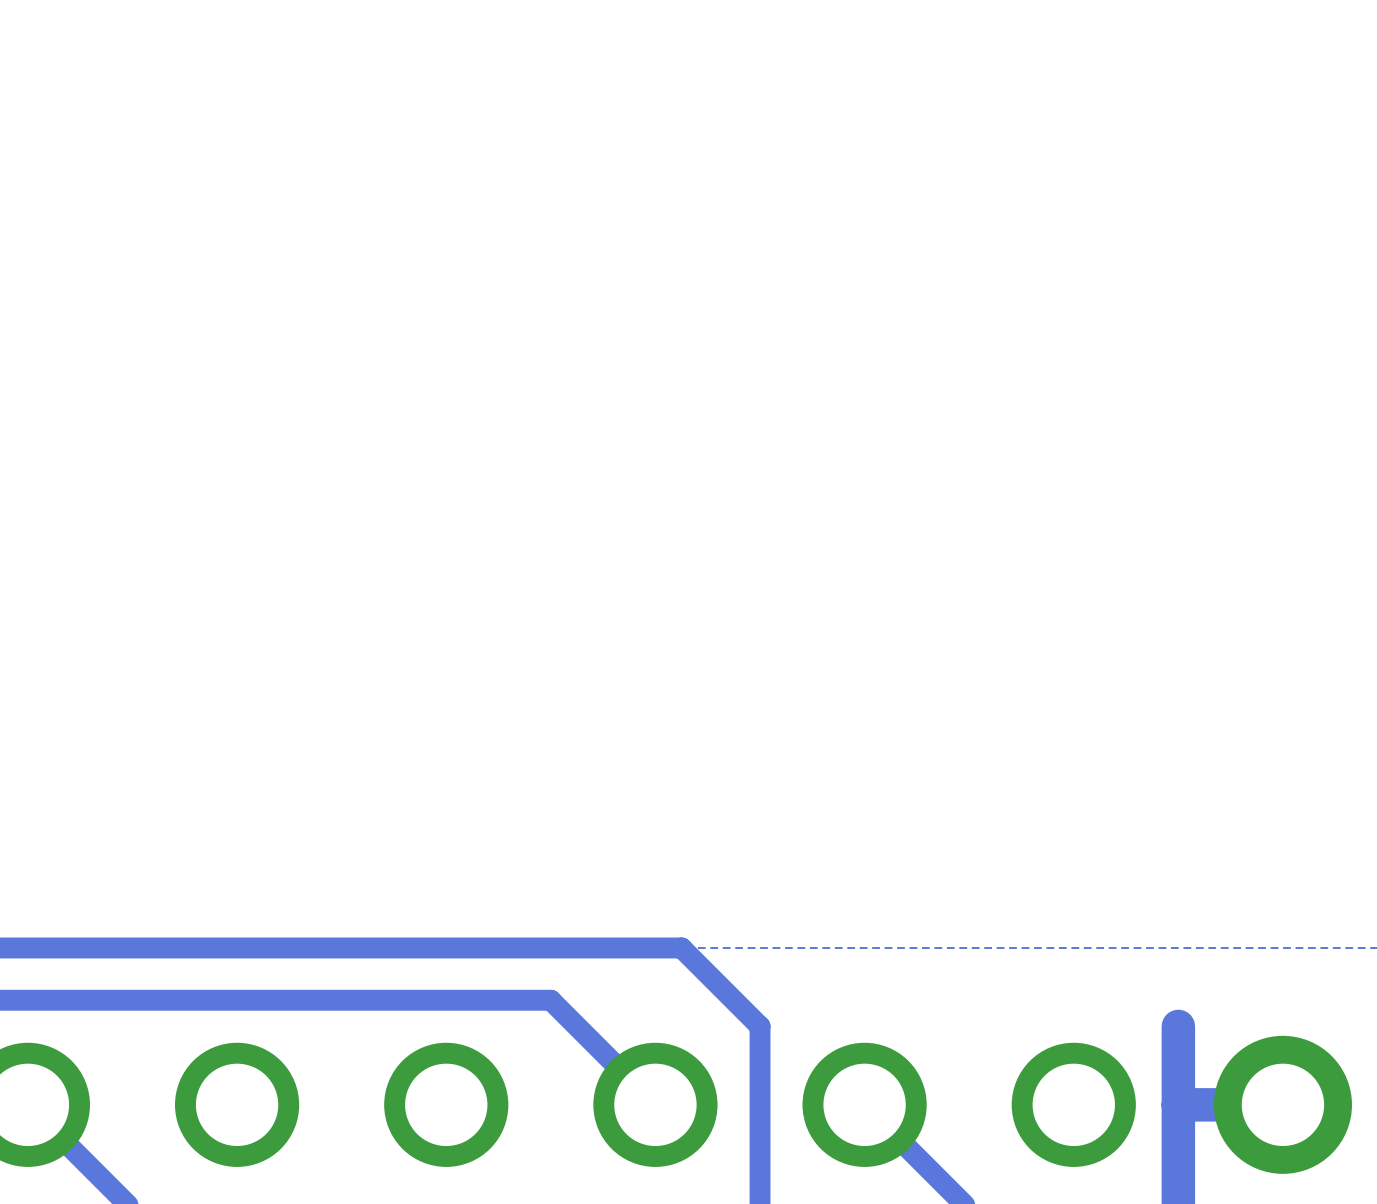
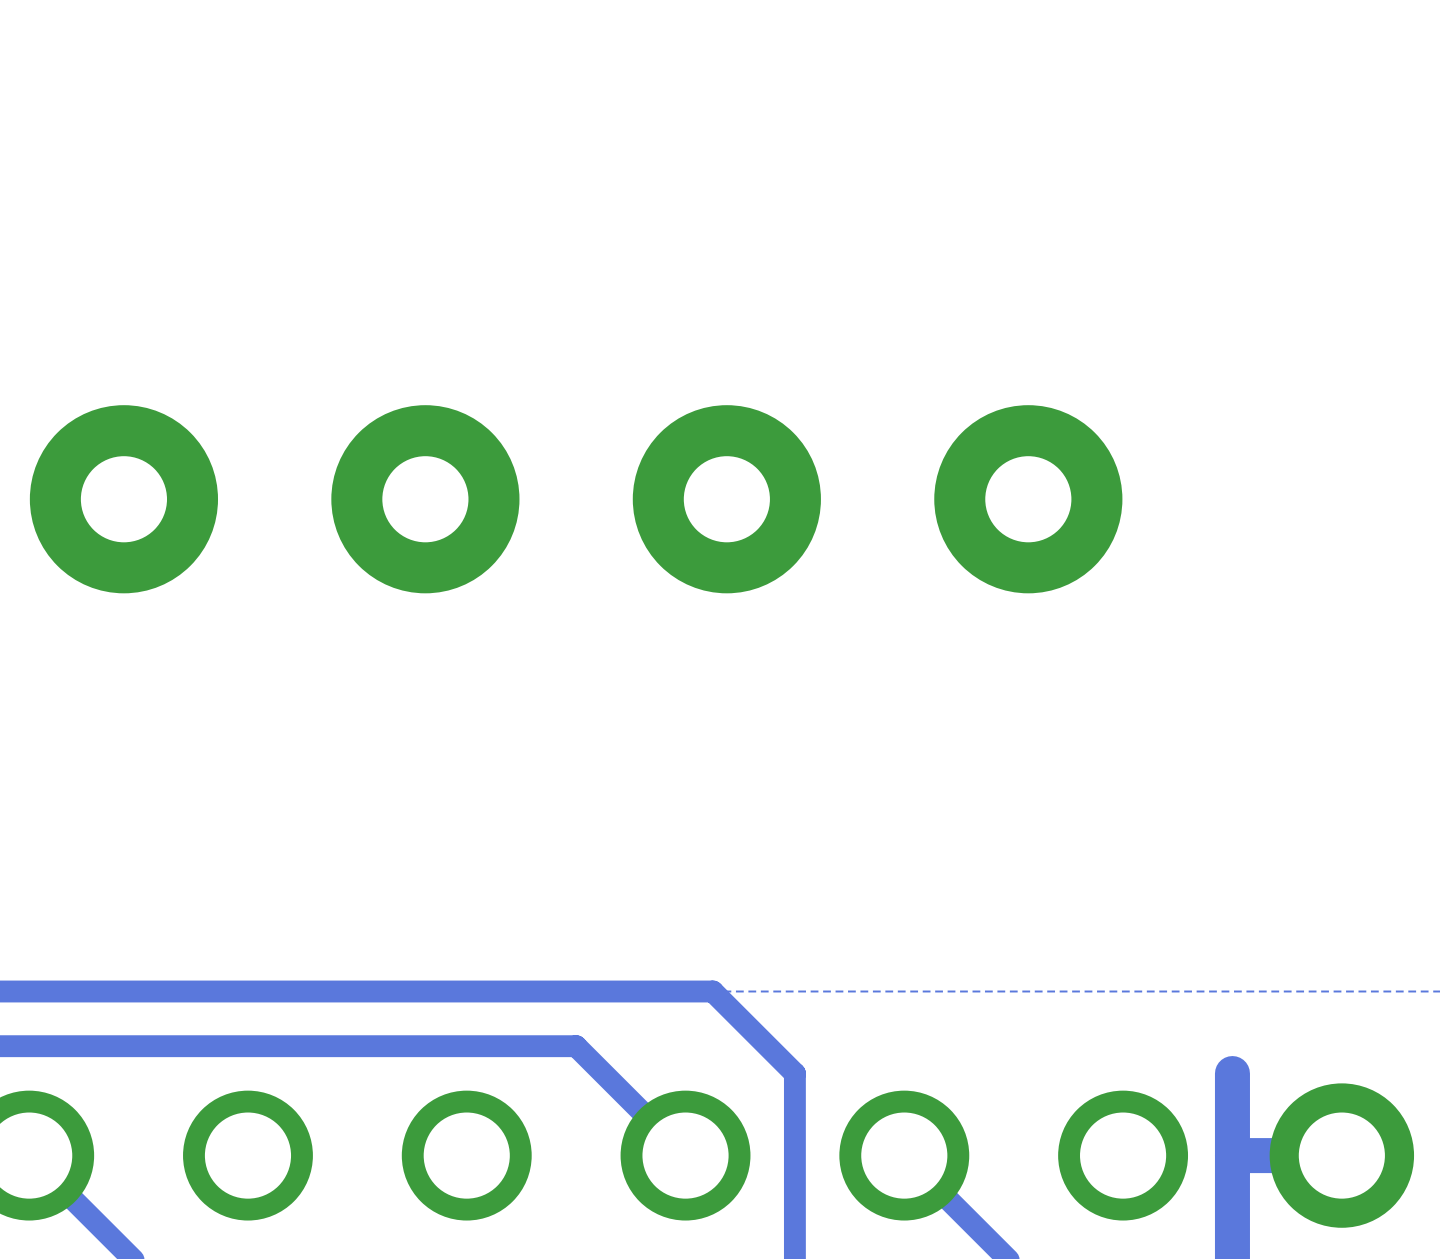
part: none -> (576, 499)

